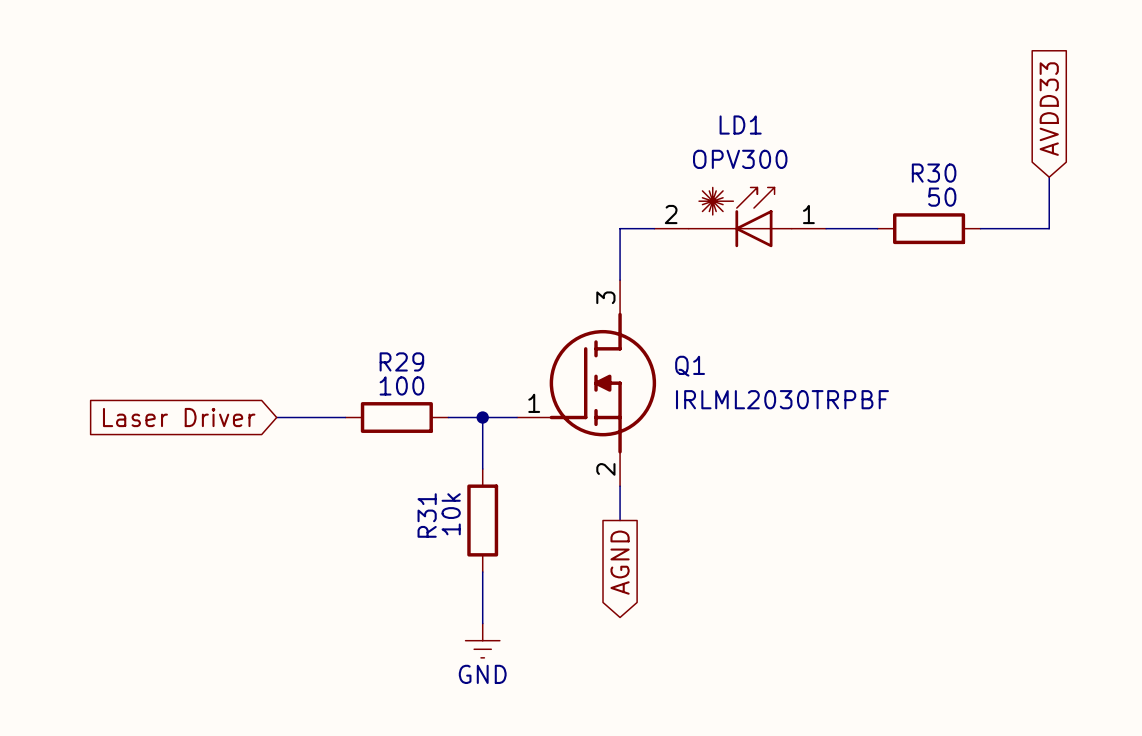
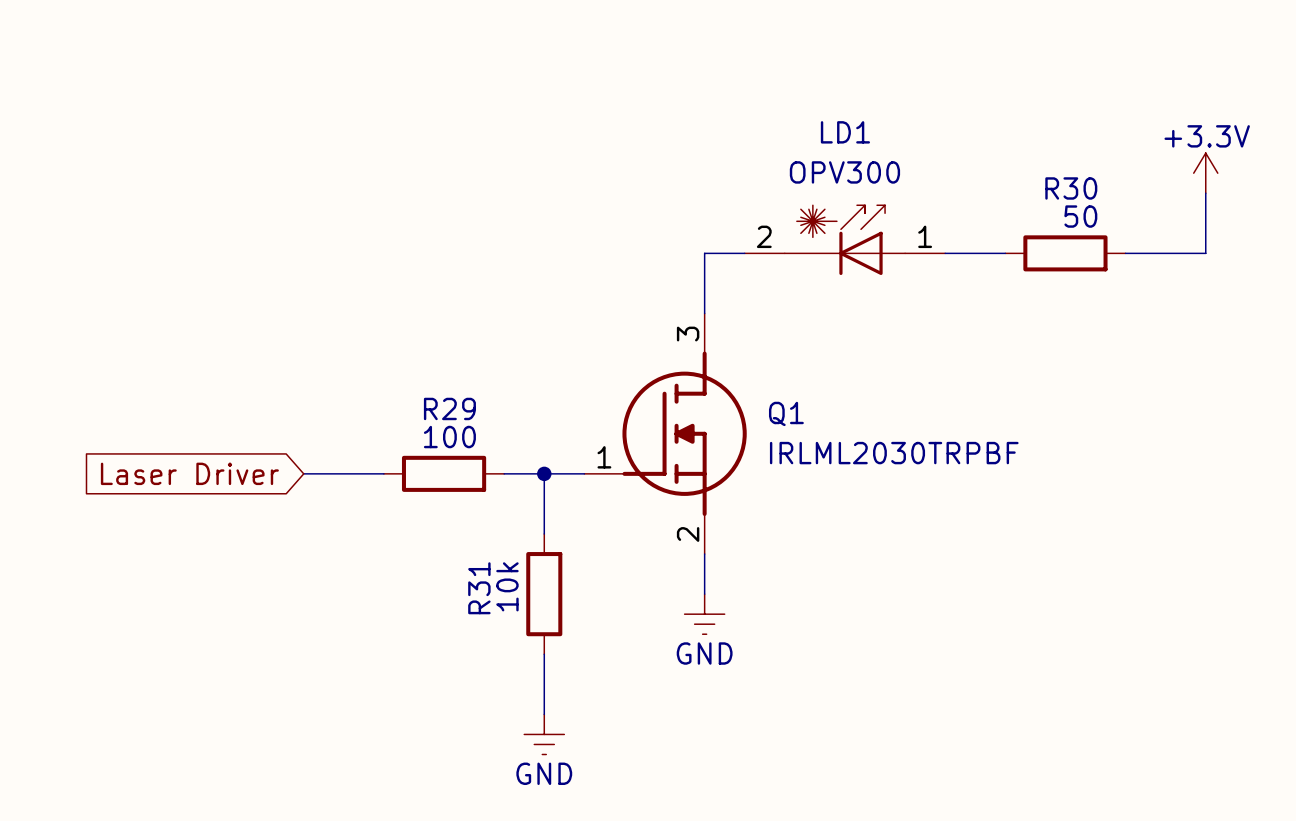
global label: AVDD33 (1049, 109) -> none
power symbol: none -> +3.3V (1205, 173)
power symbol: none -> GND (704, 614)
global label: AGND (620, 562) -> none

